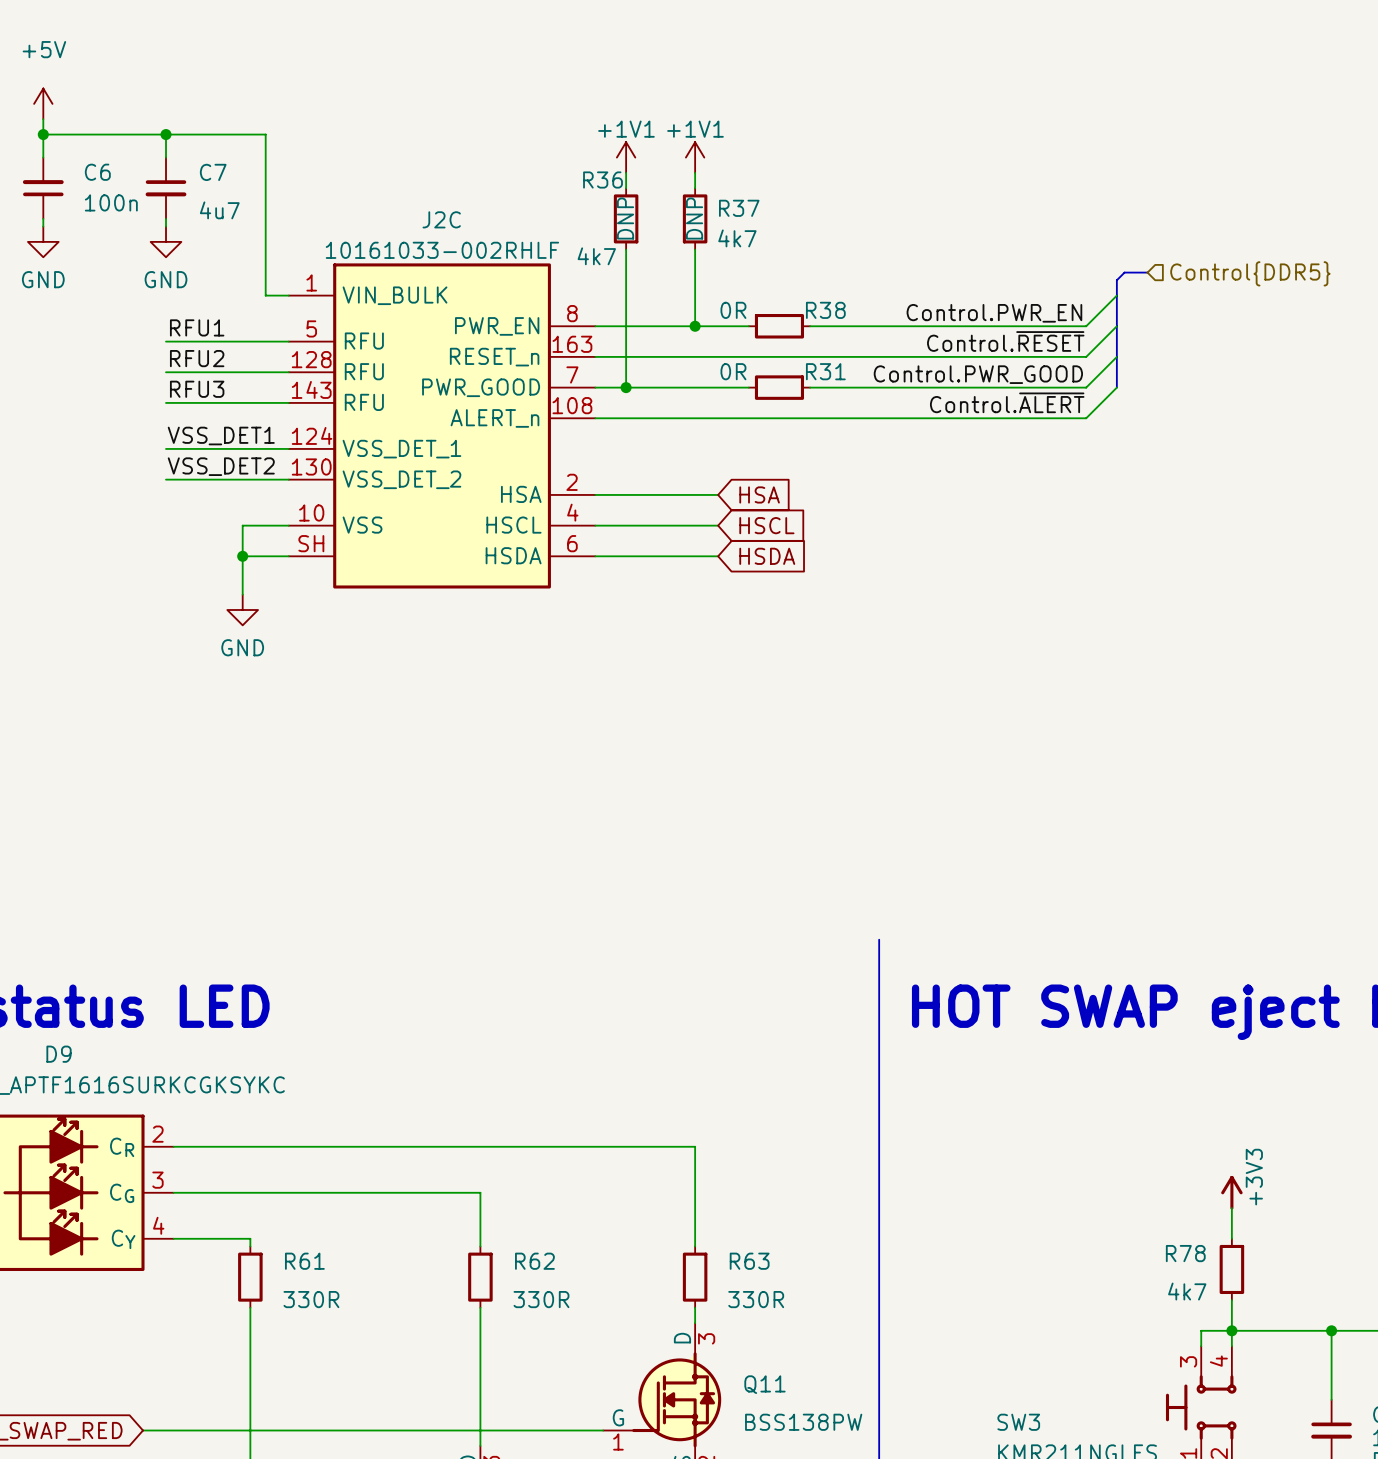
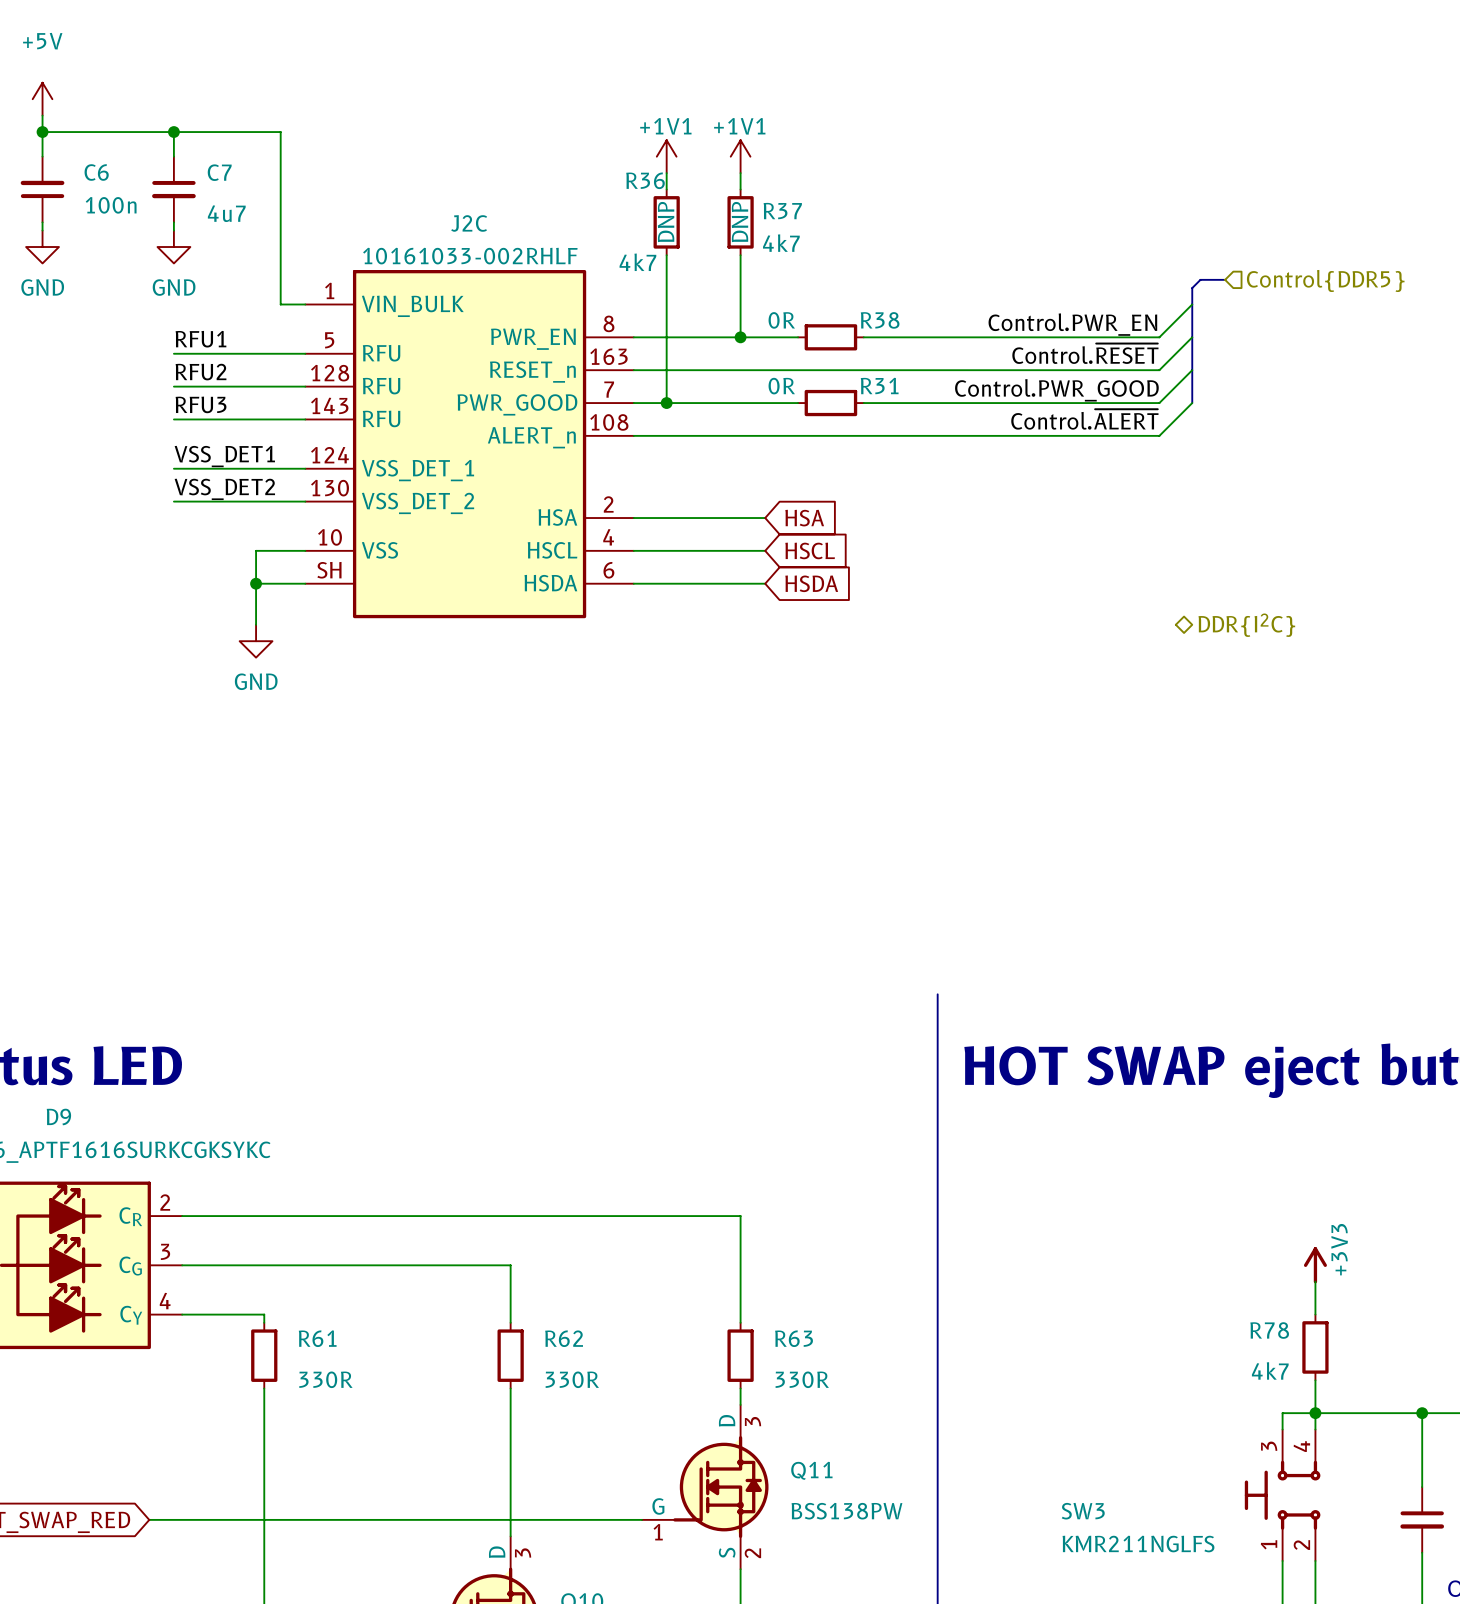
hierarchical label: none -> DDR{I2C} (1246, 625)

